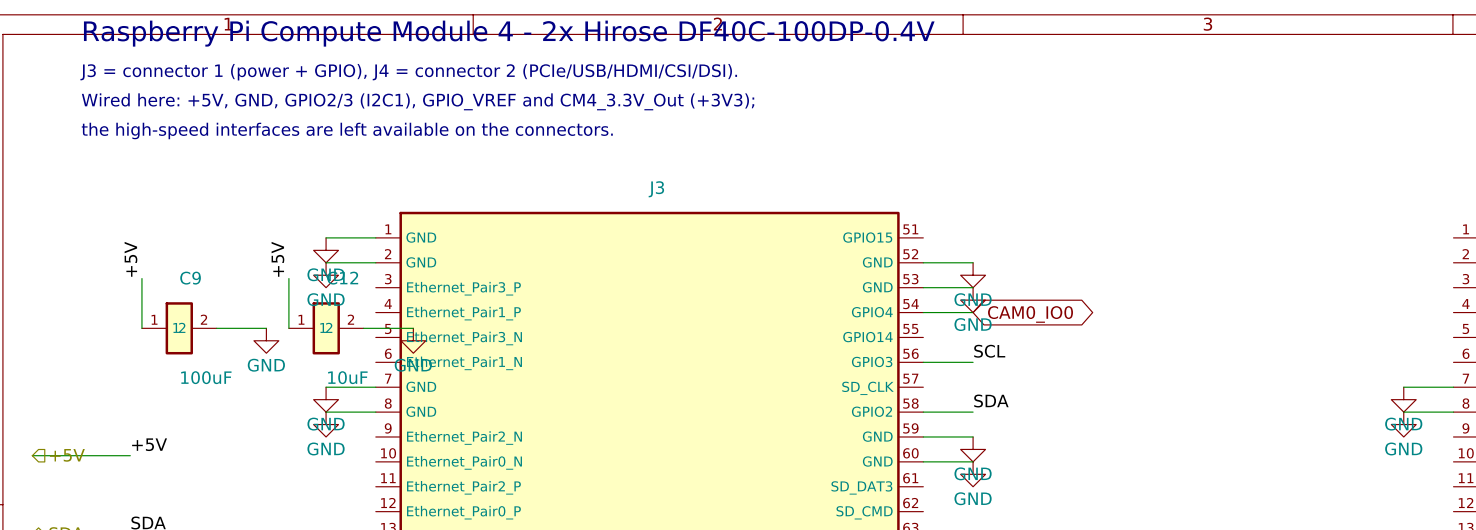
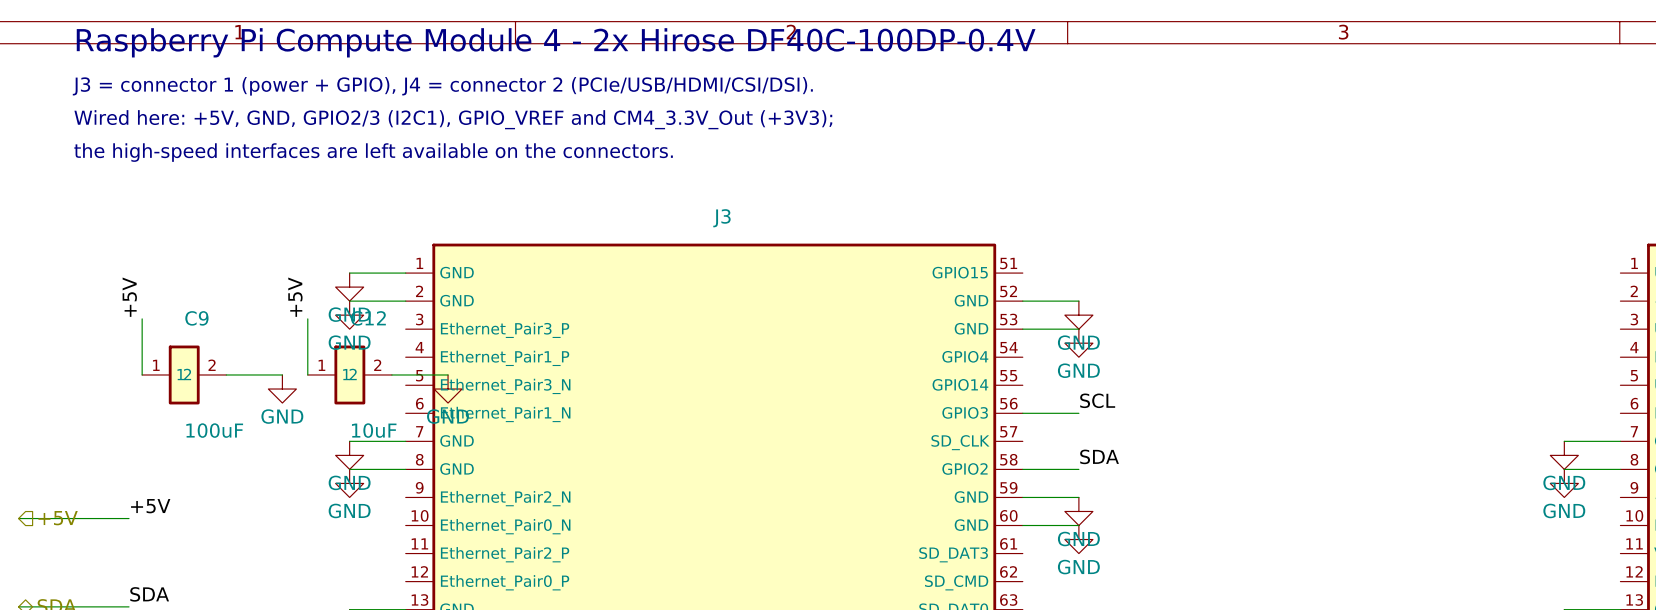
wire: (923, 312) (973, 312) -> none
global label: CAM0_IO0 (1030, 314) -> none

